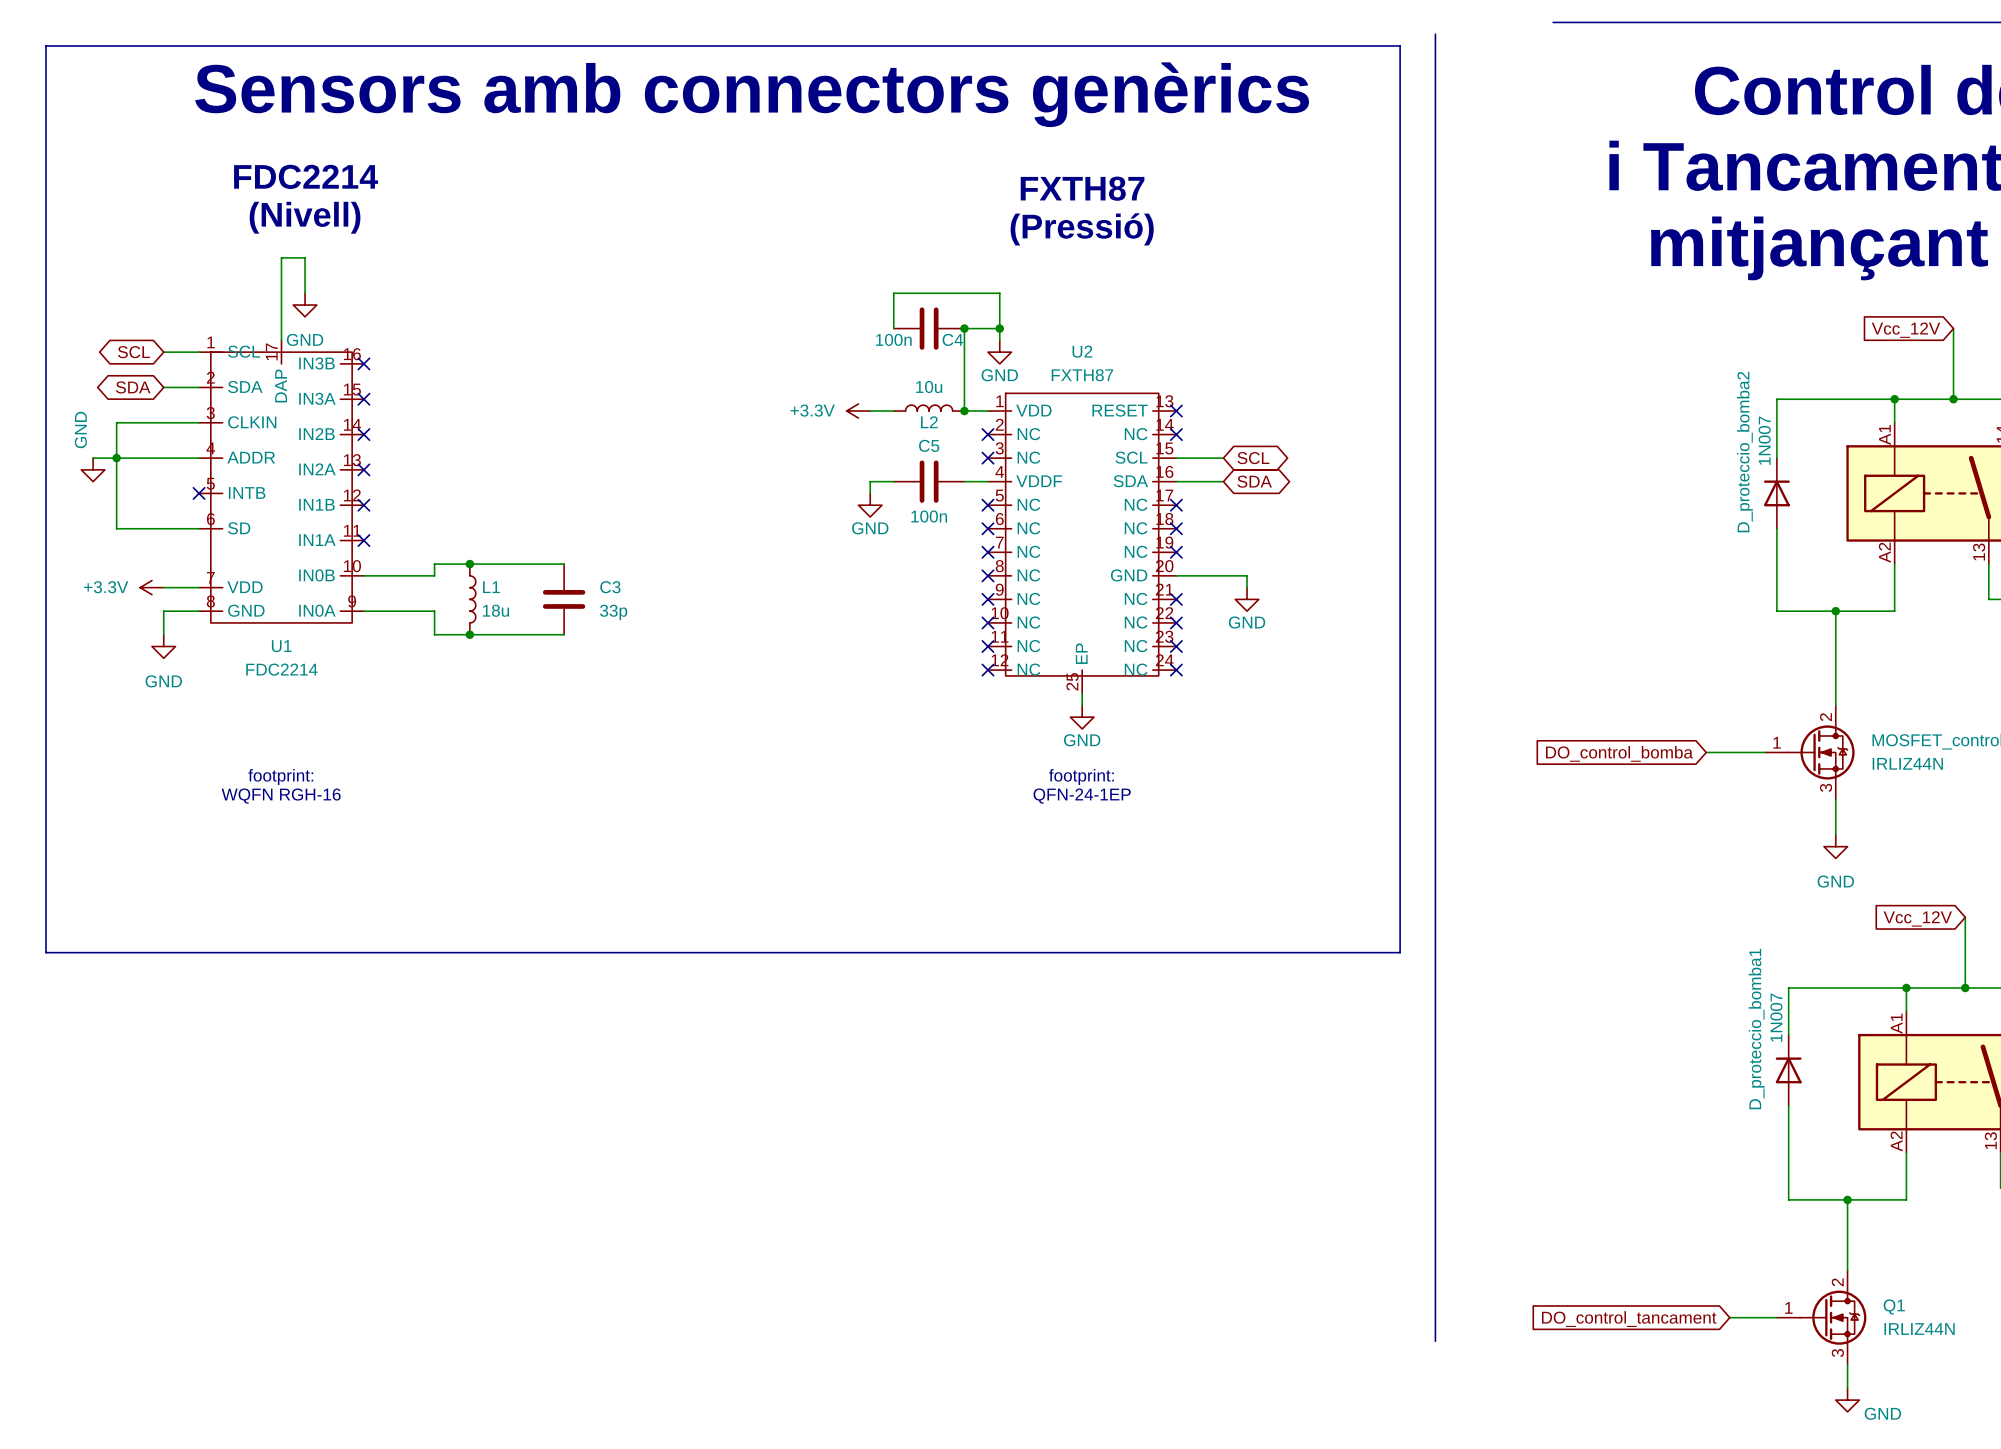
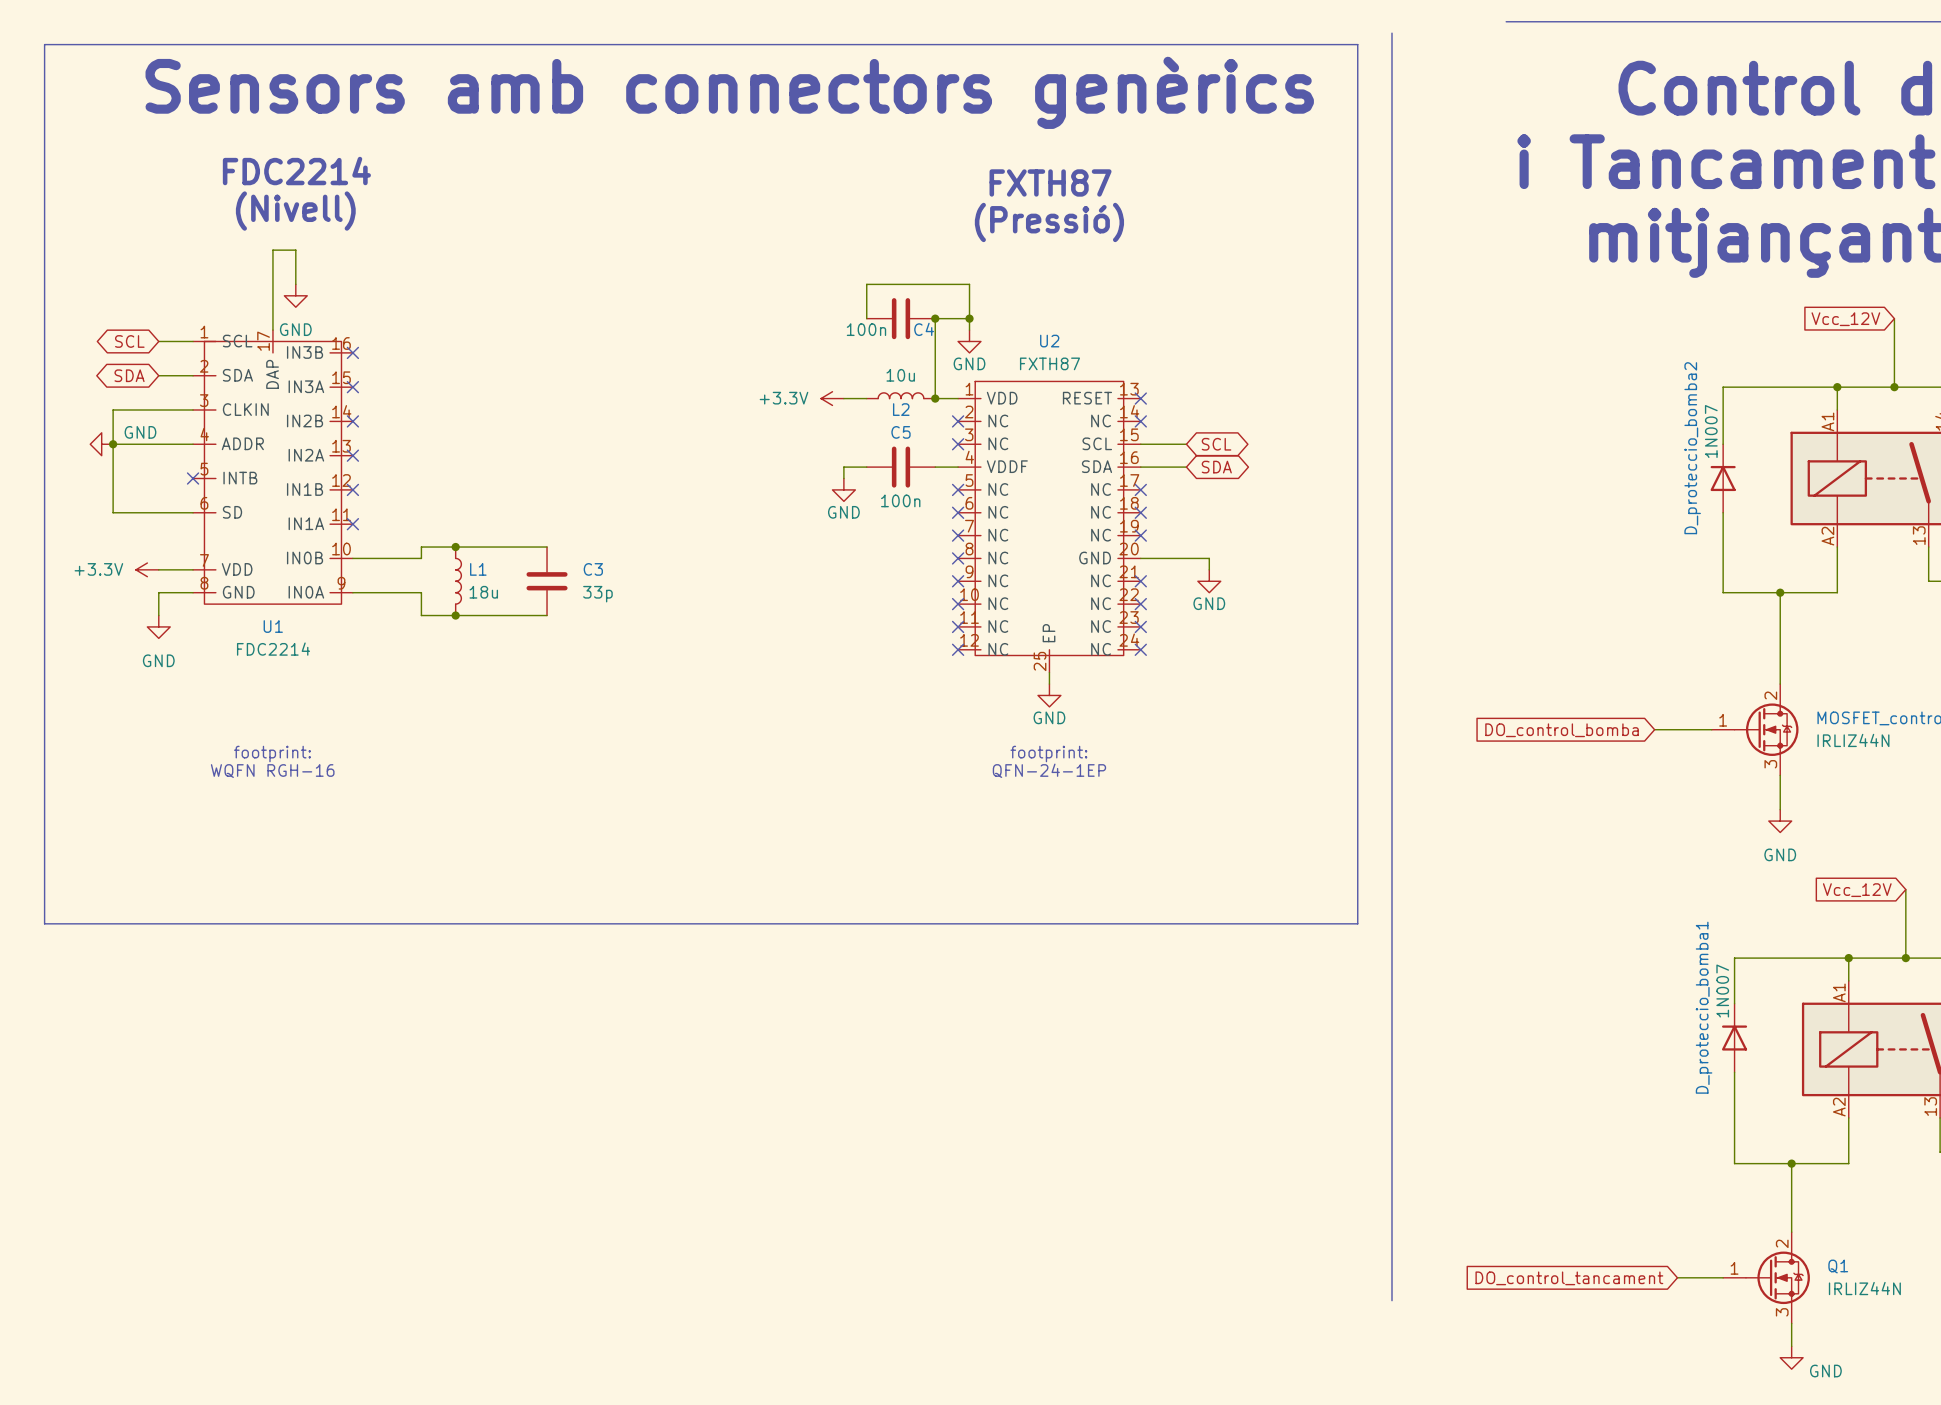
power symbol rotation: 0° (93, 469) -> 90° clockwise (101, 444)
power symbol position: GND (93, 469) -> GND (101, 444)

